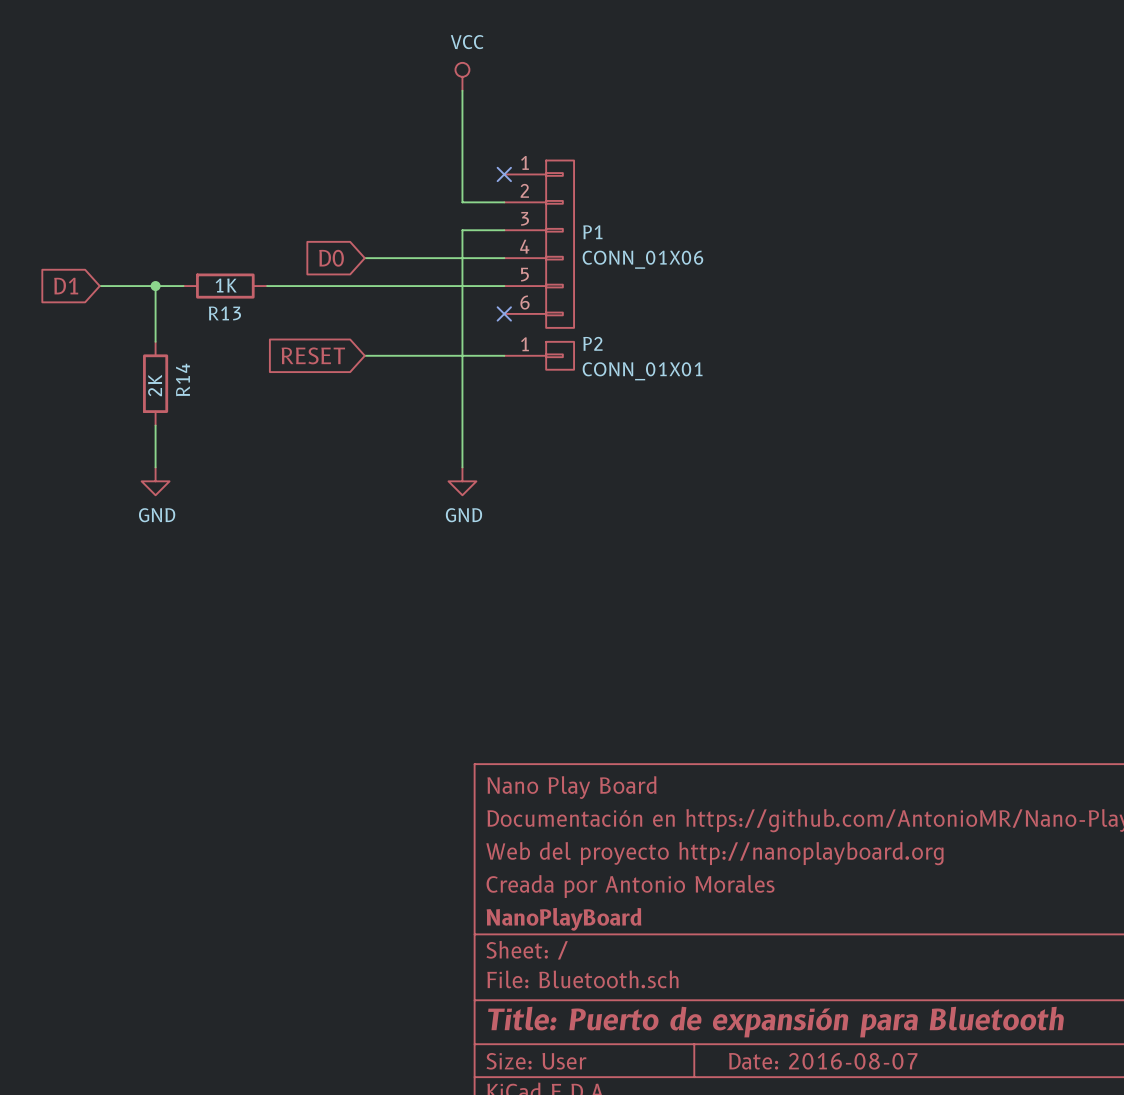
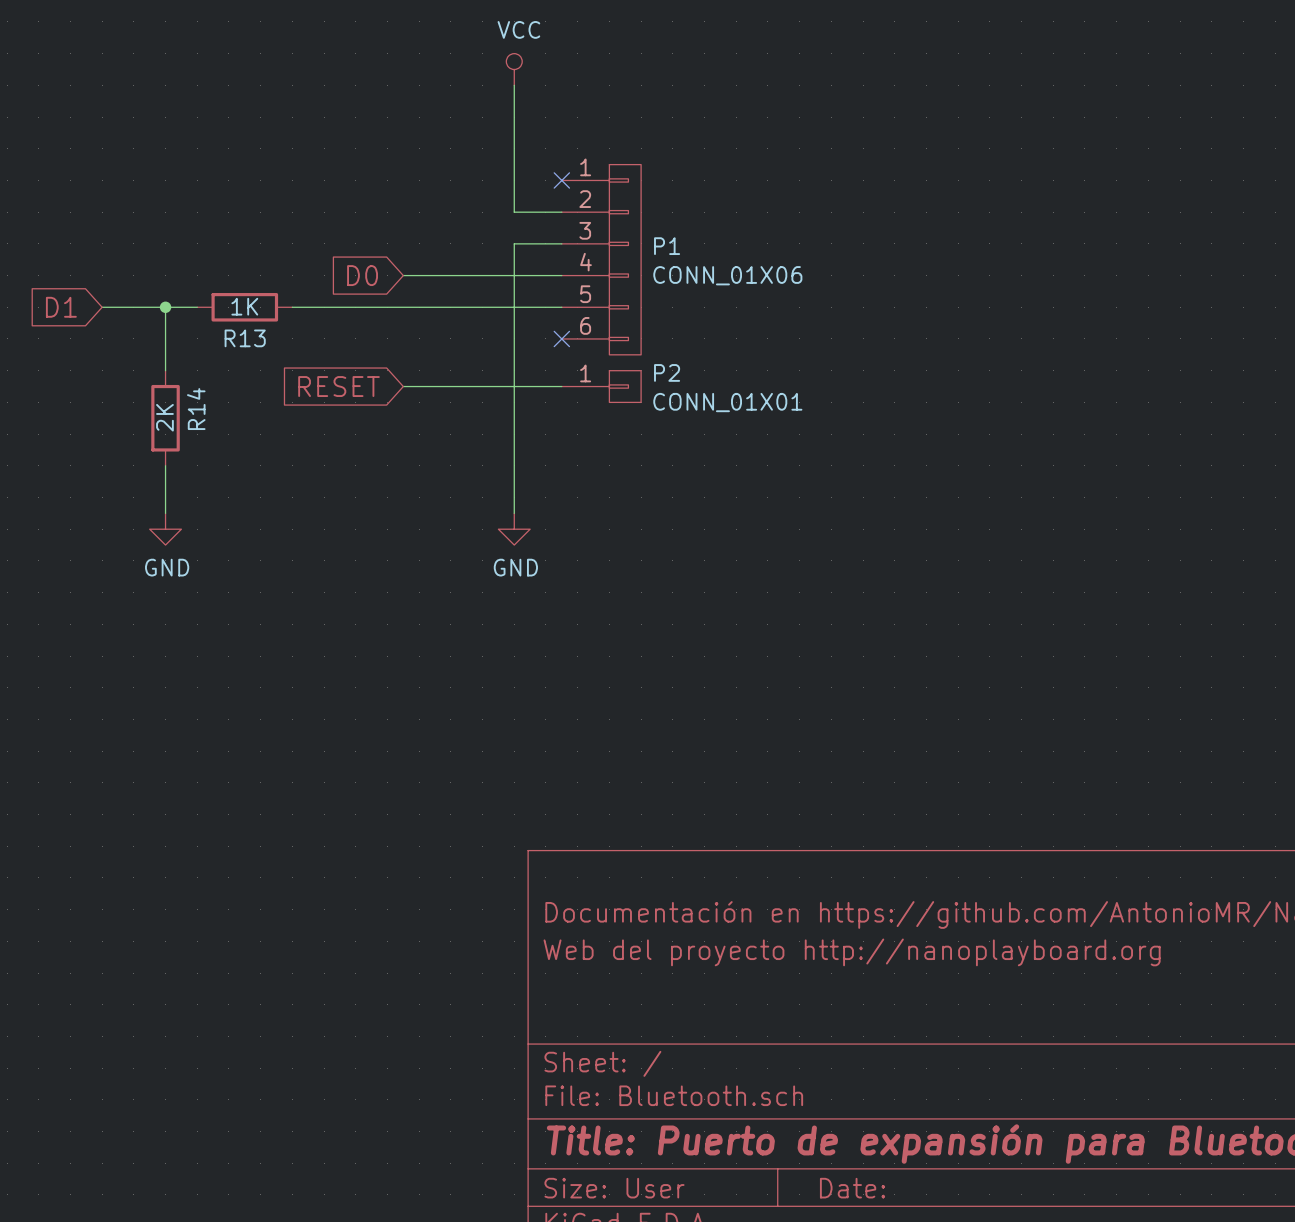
title block: Nano Play Board (571, 787) -> none
title block: Creada por Antonio Morales (630, 886) -> none
title block: NanoPlayBoard (563, 919) -> none
title block: Date: 2016-08-07 (823, 1061) -> Date: (852, 1188)

